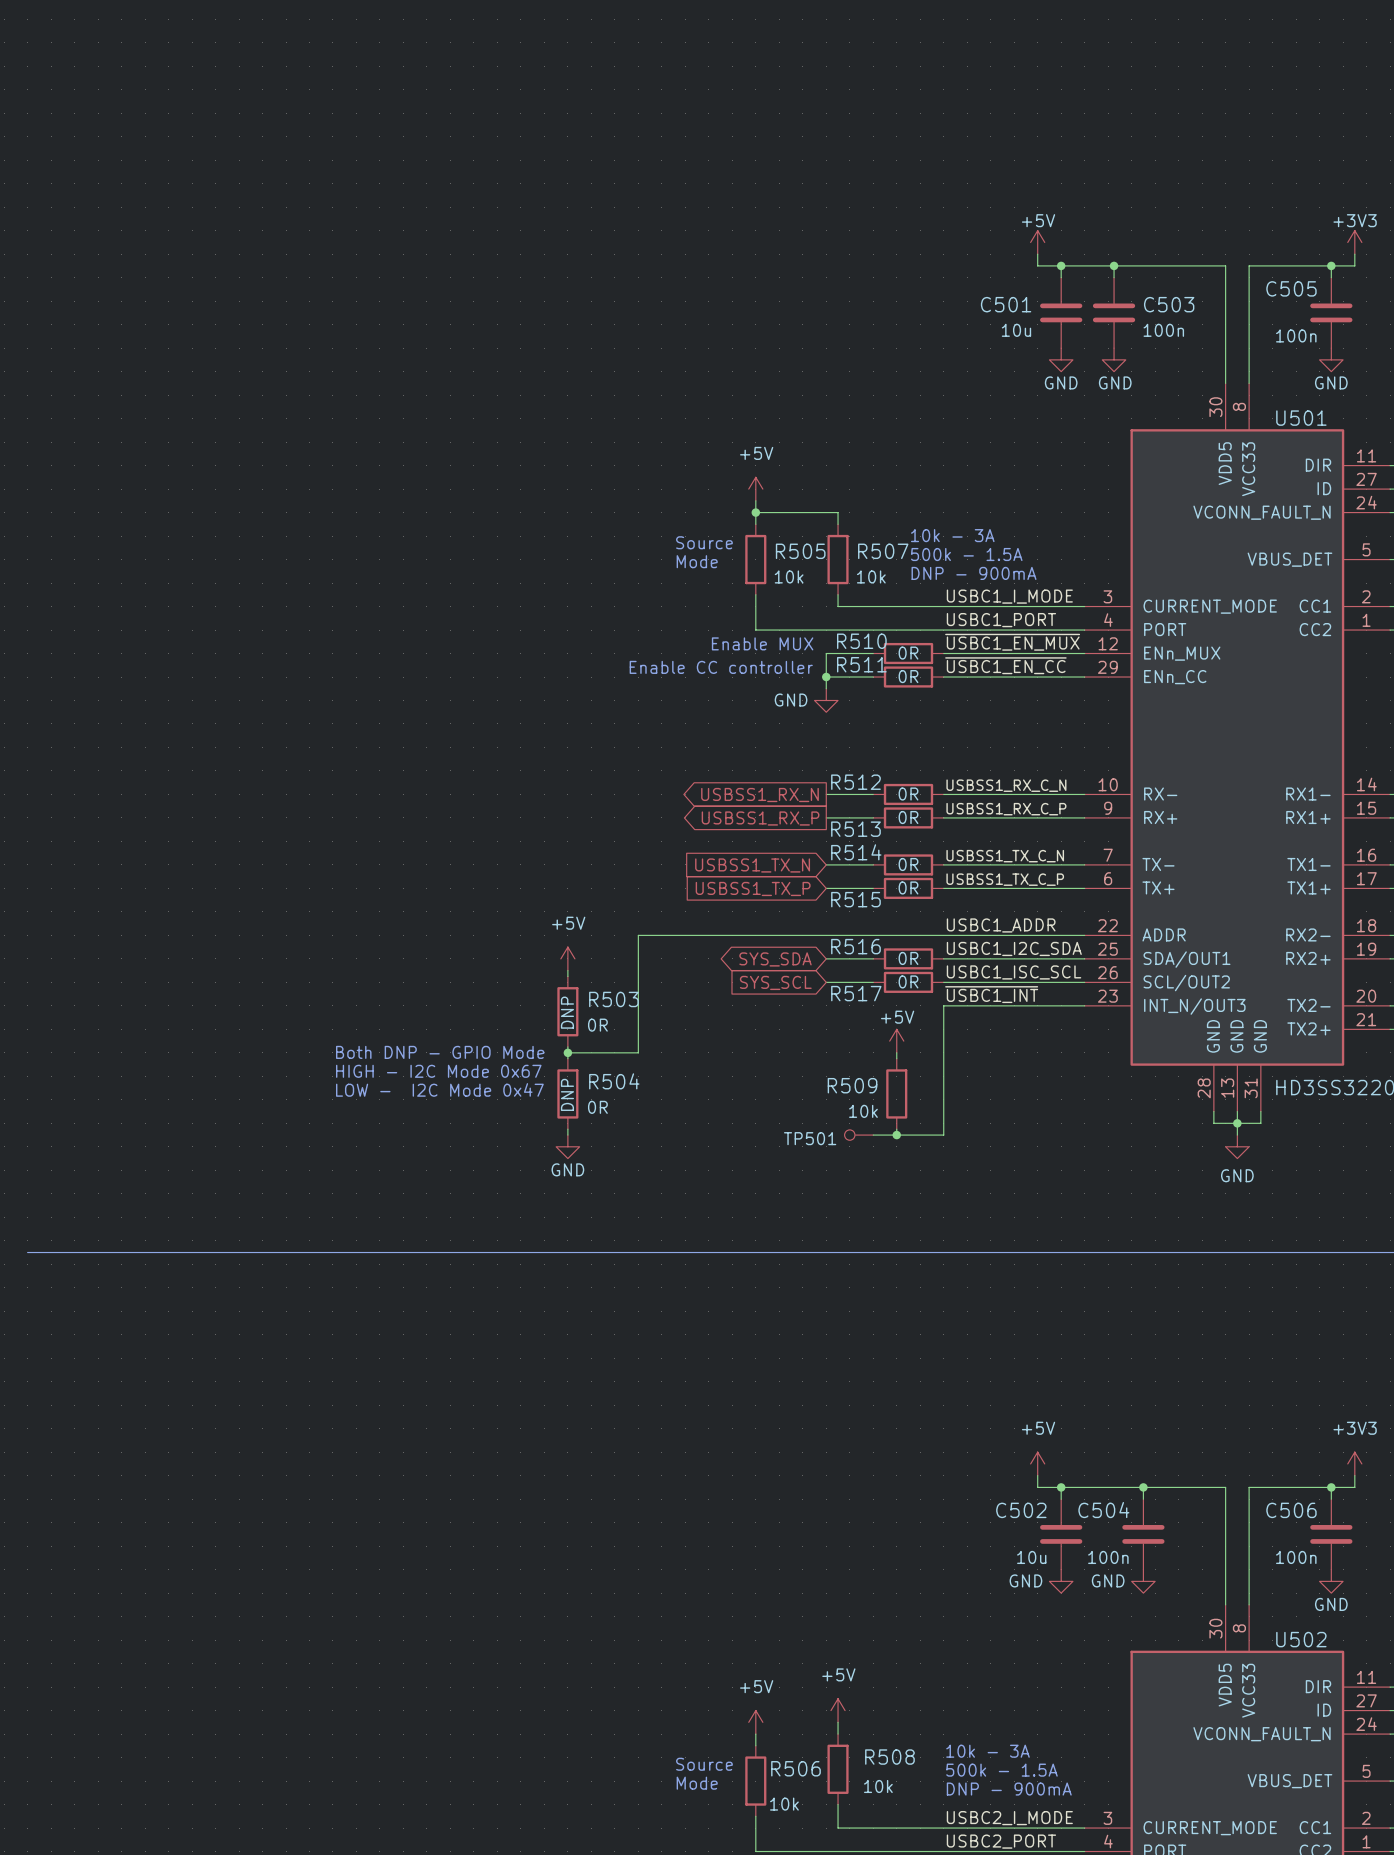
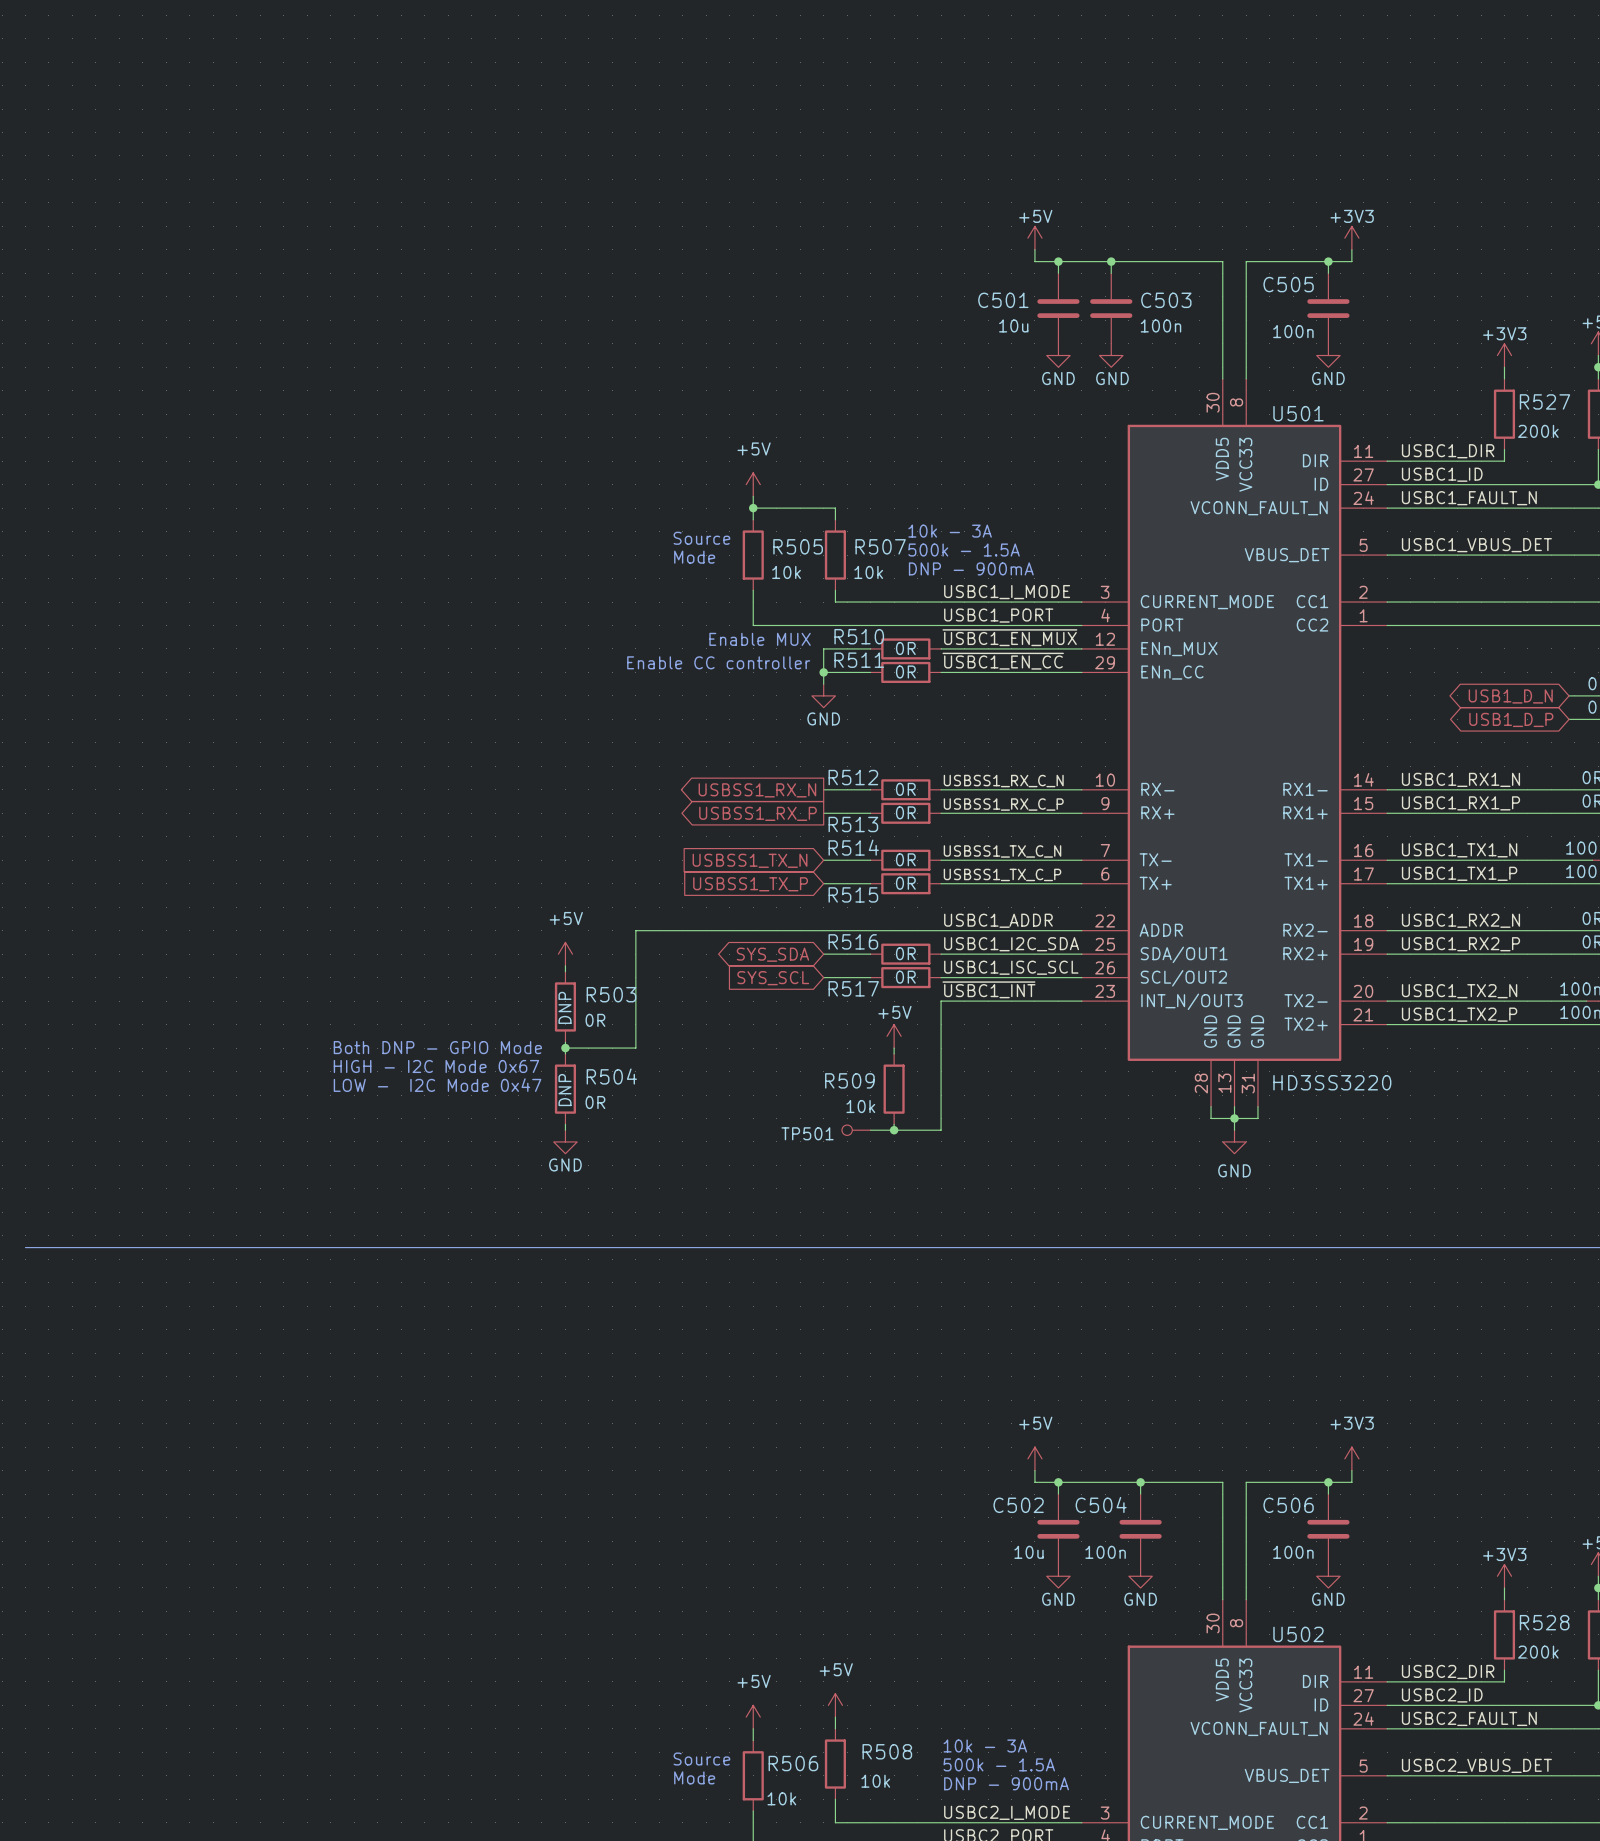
power symbol text position: GND (791, 700) -> GND (823, 718)
power symbol text position: GND (1025, 1580) -> GND (1058, 1599)
power symbol text position: GND (1108, 1580) -> GND (1140, 1599)

